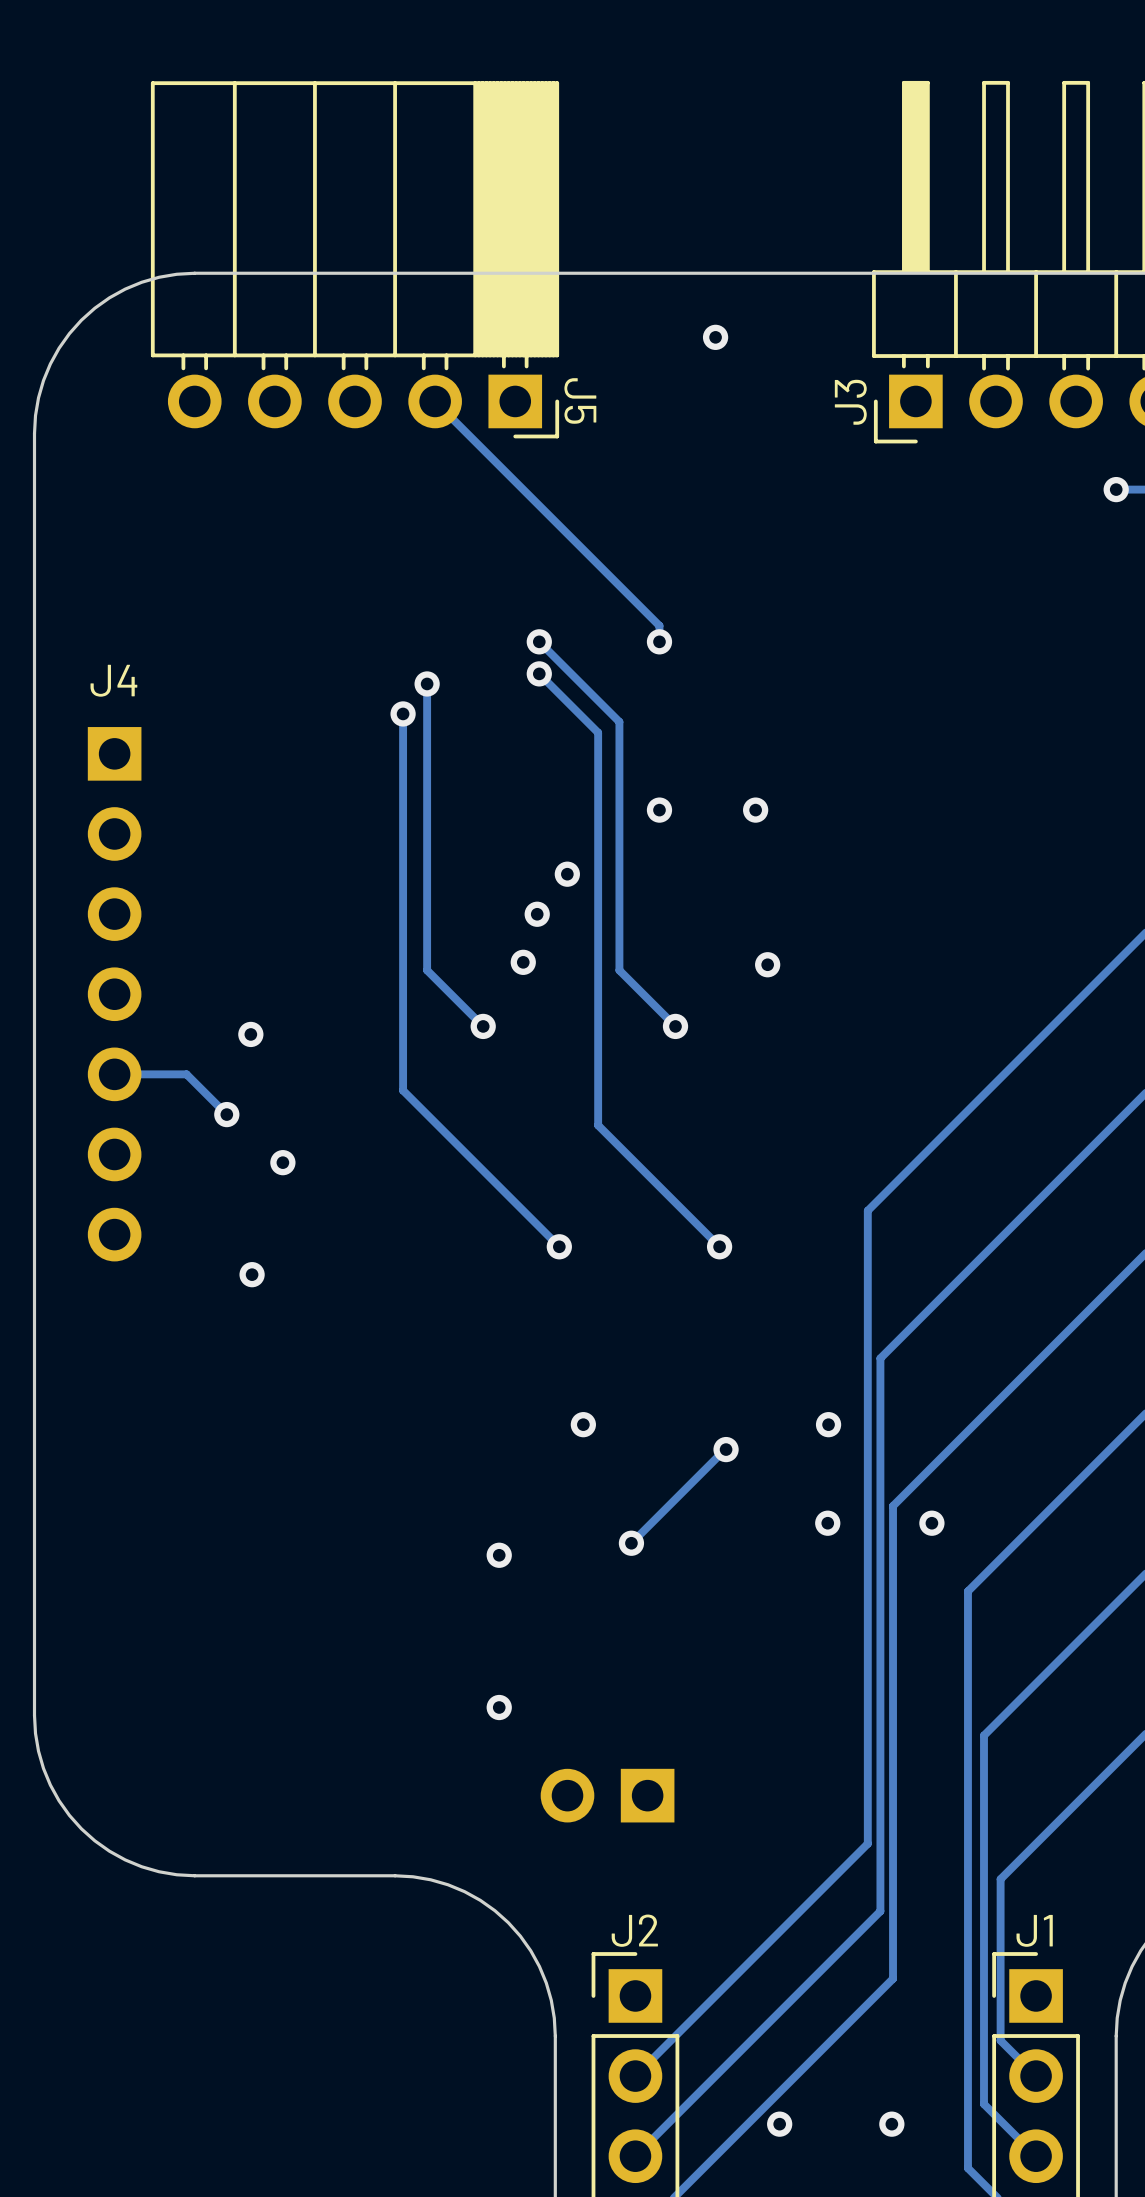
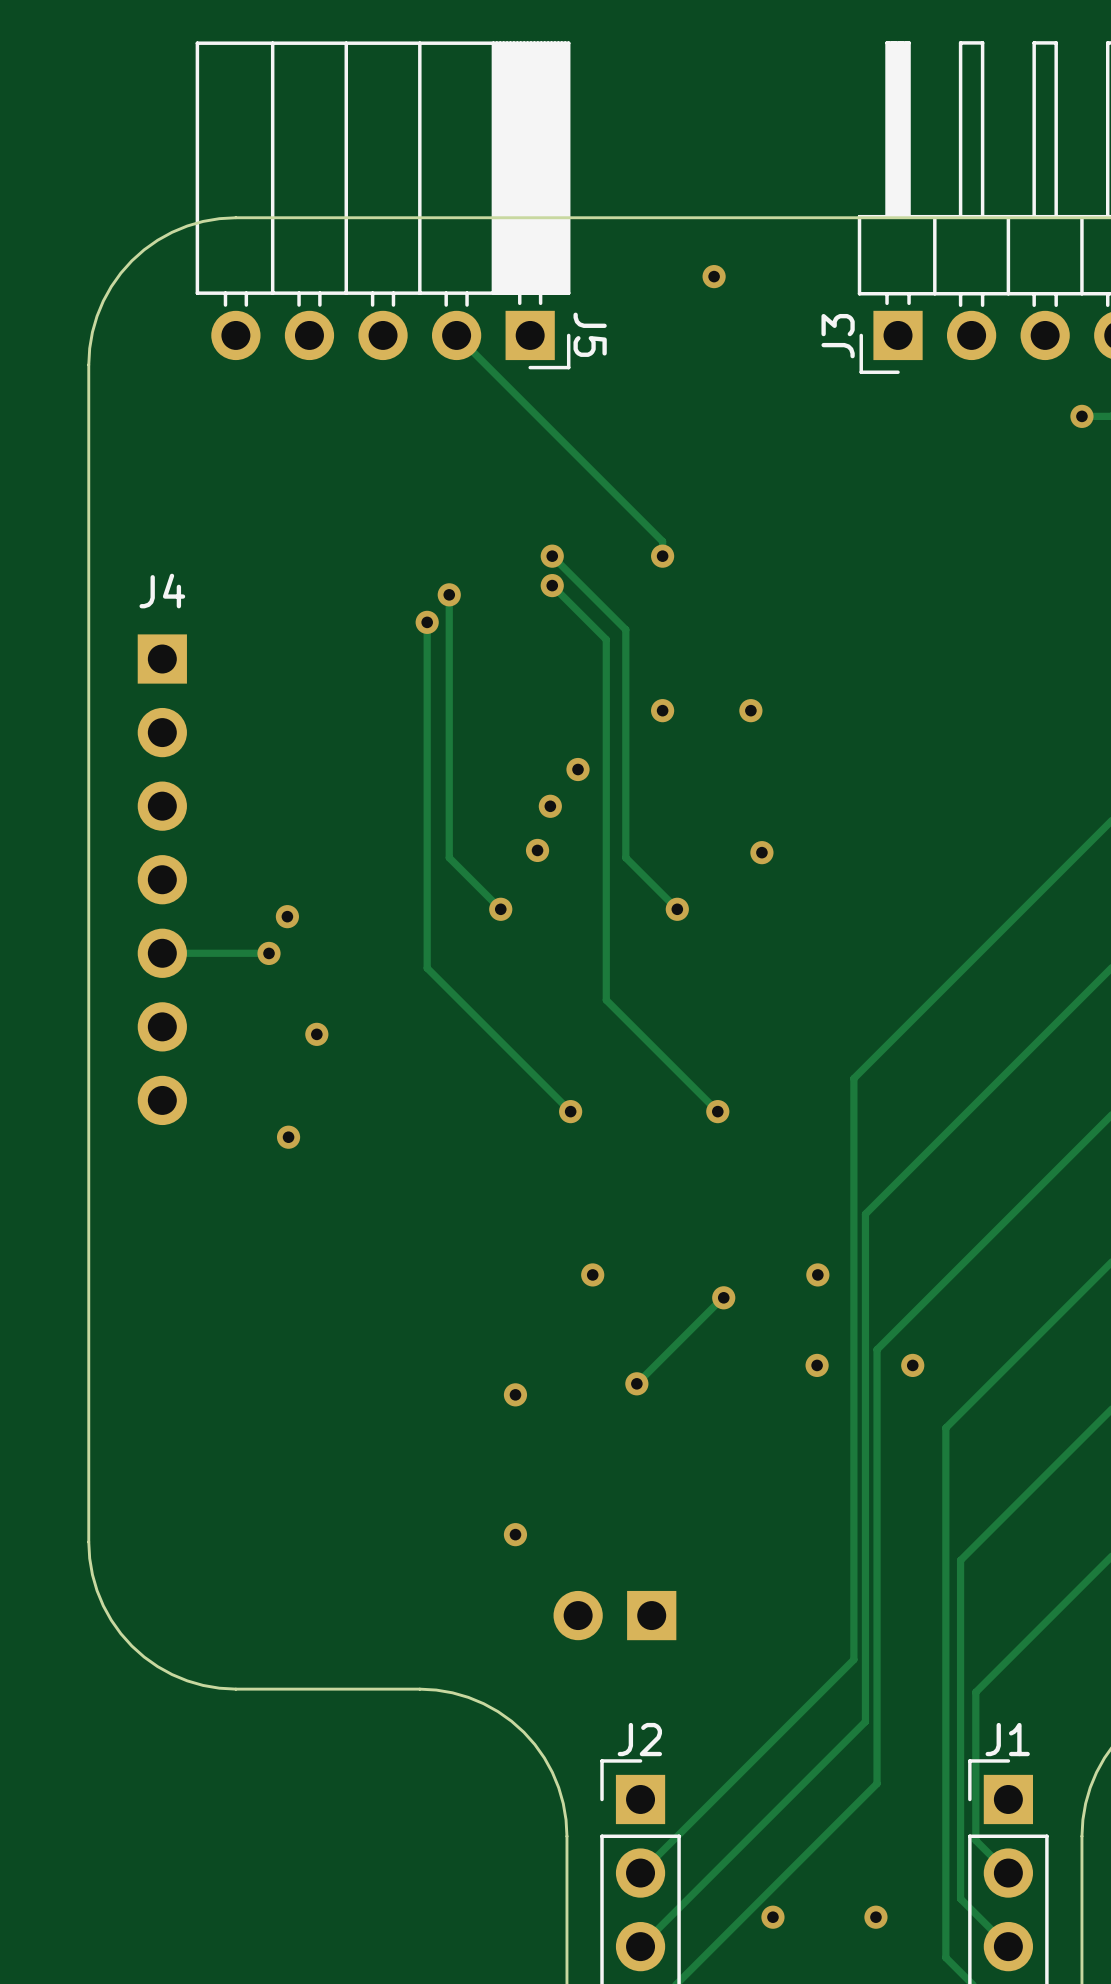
track: (186, 1074) (226, 1114) -> (228, 953) (268, 953)
via position: (226, 1114) -> (269, 953)

